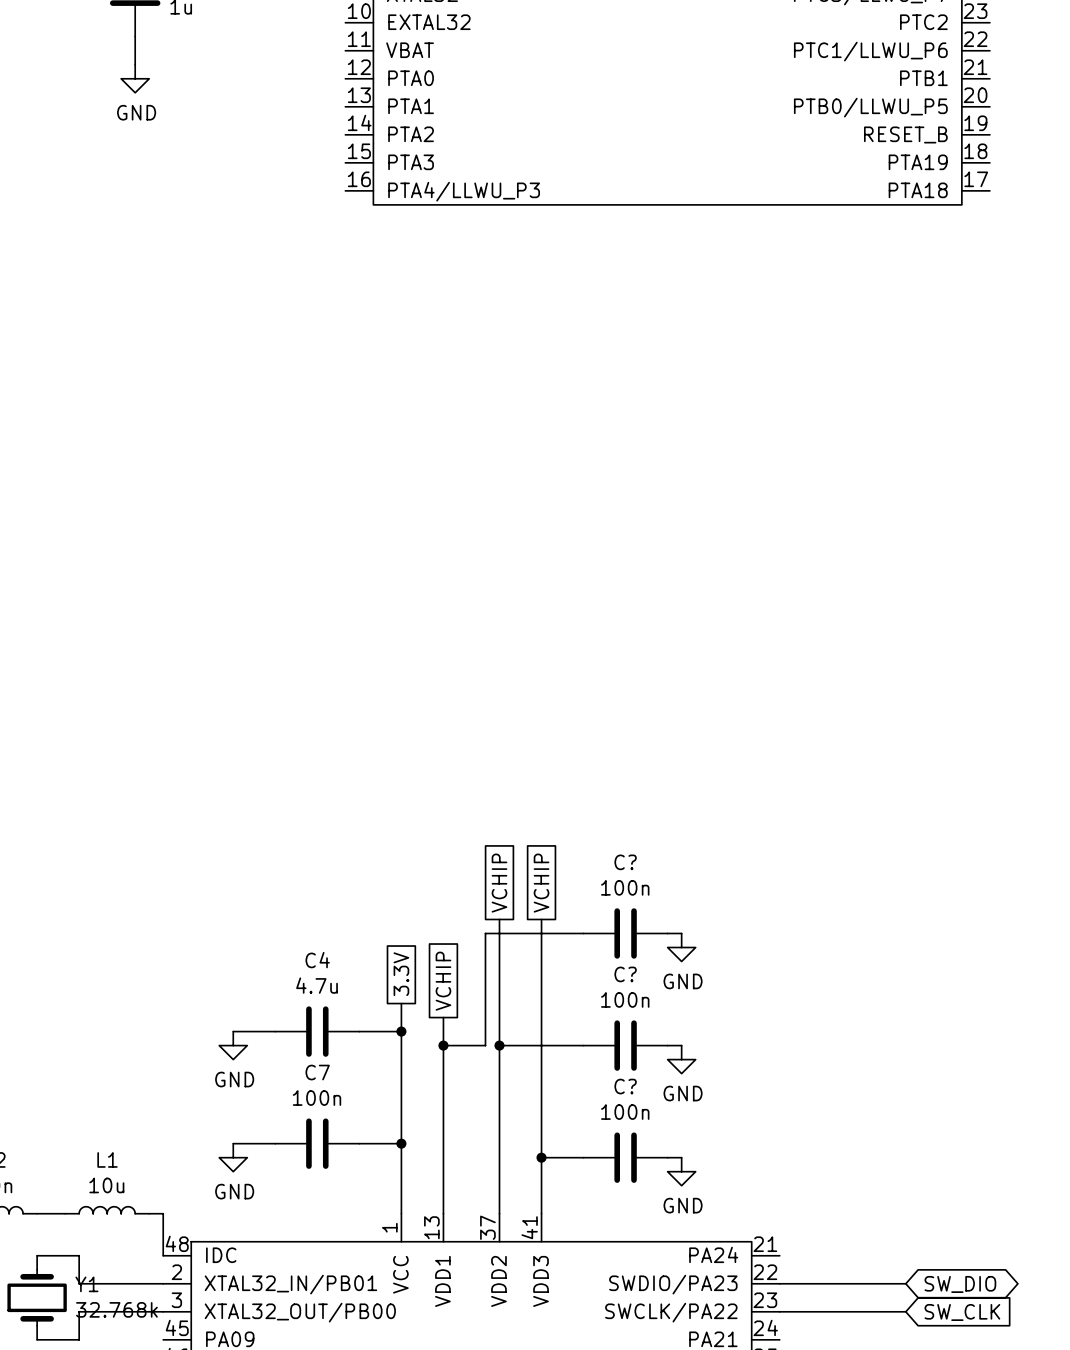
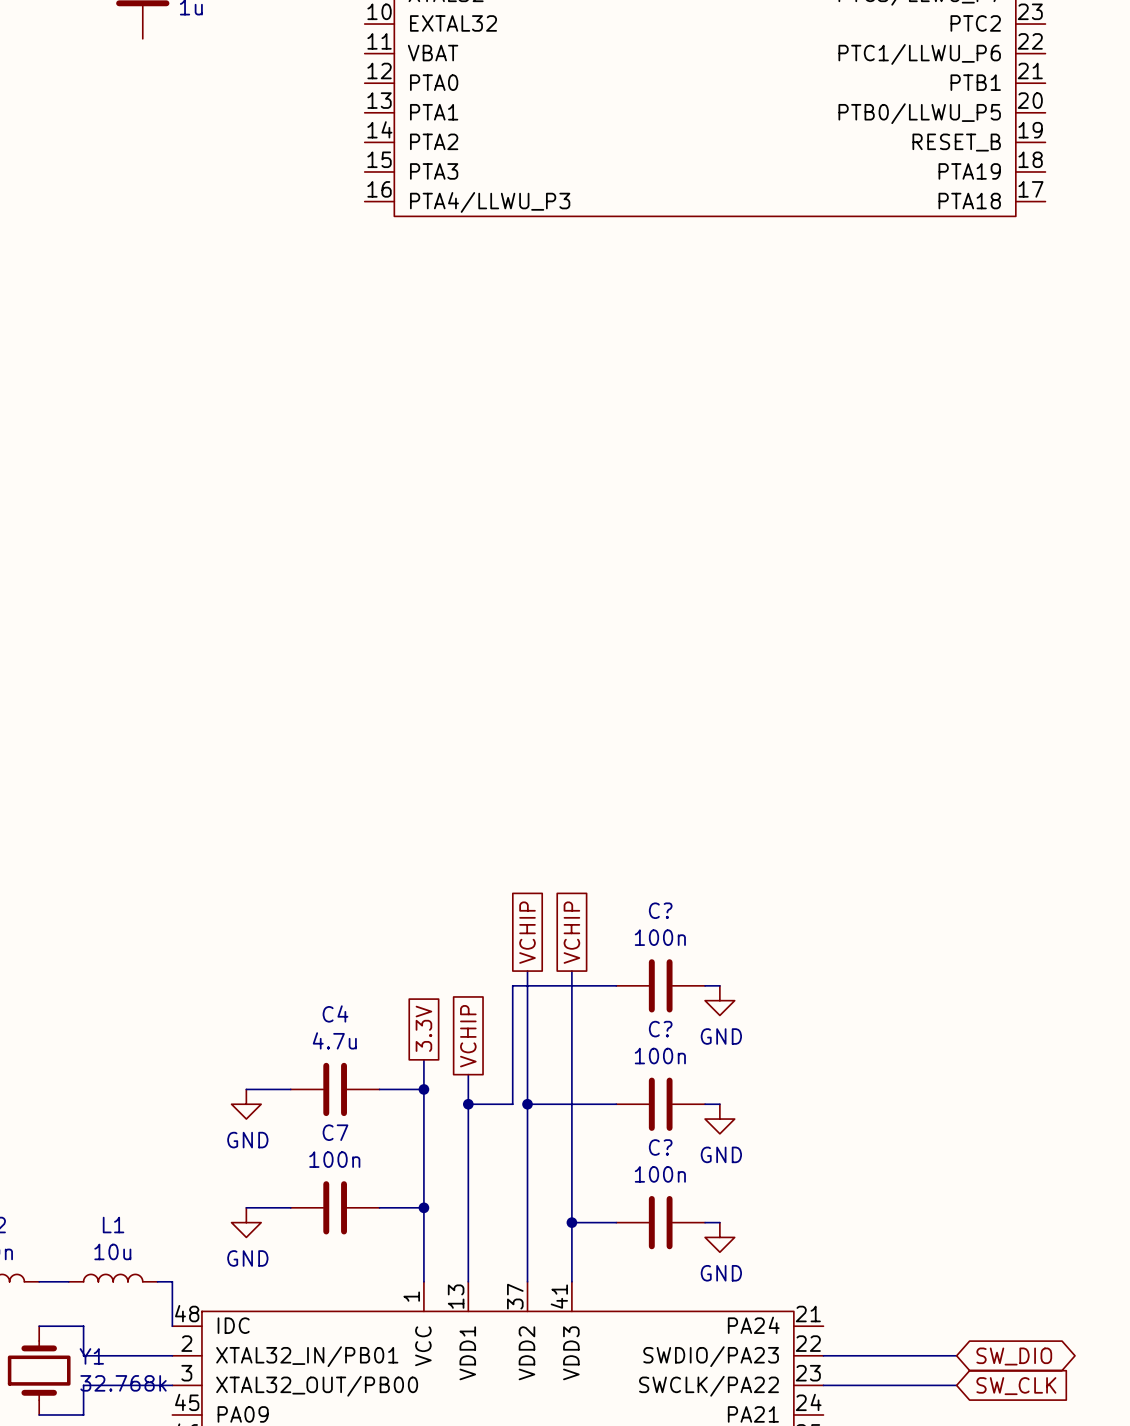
wire: (135, 36) (135, 64) -> none
power symbol: GND (135, 78) -> none

